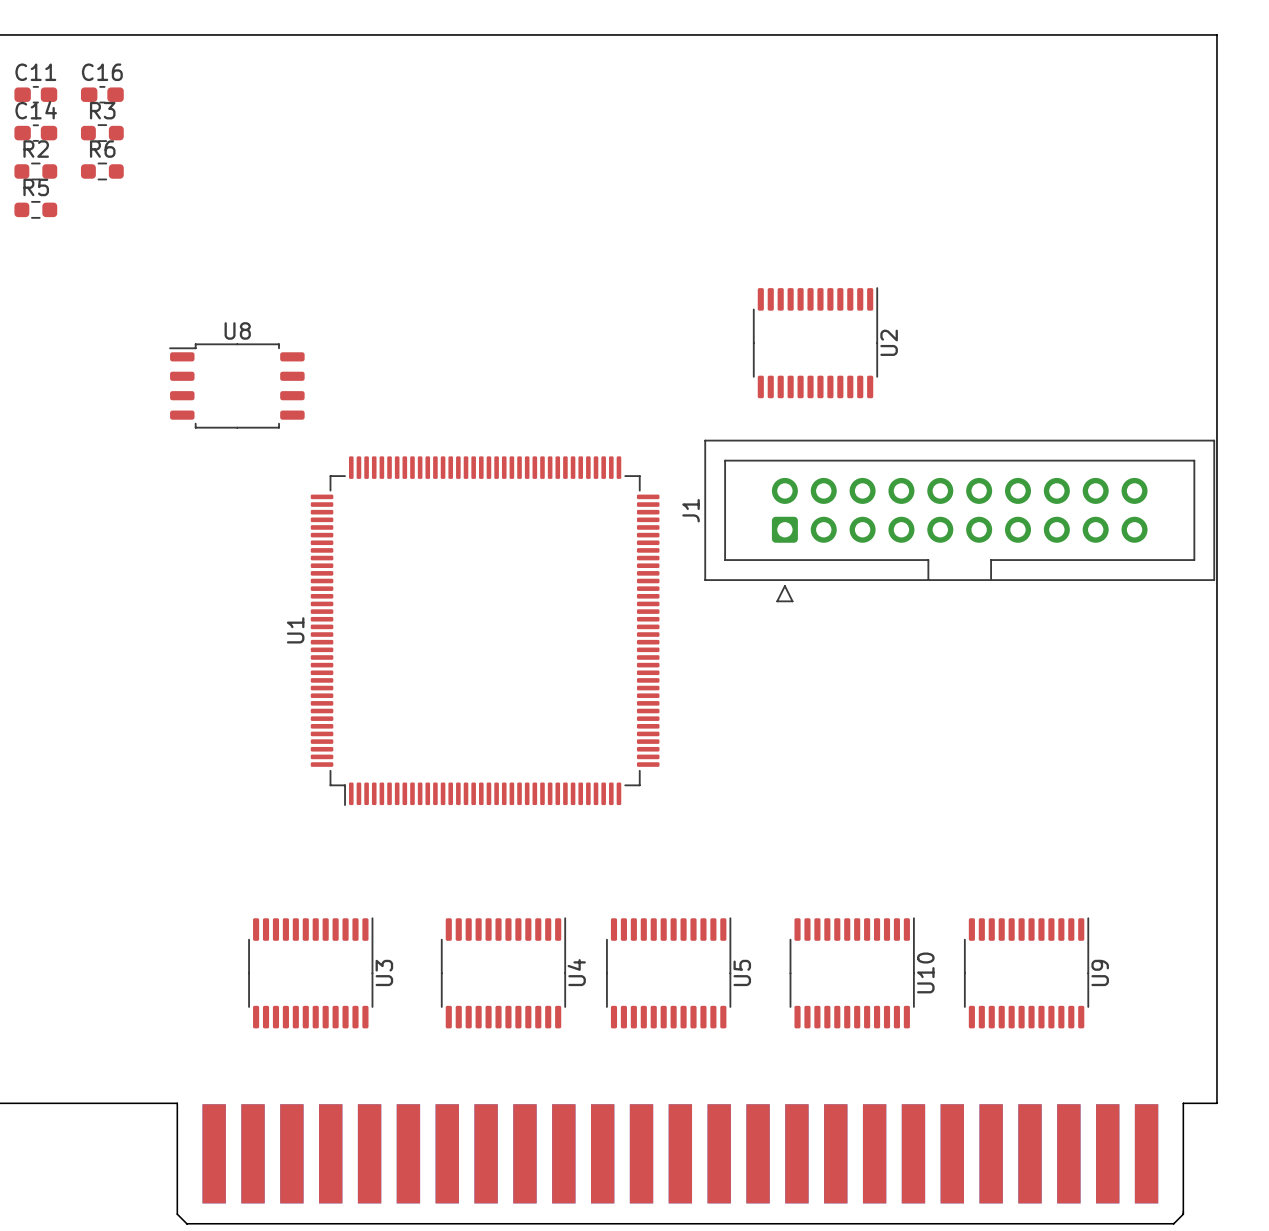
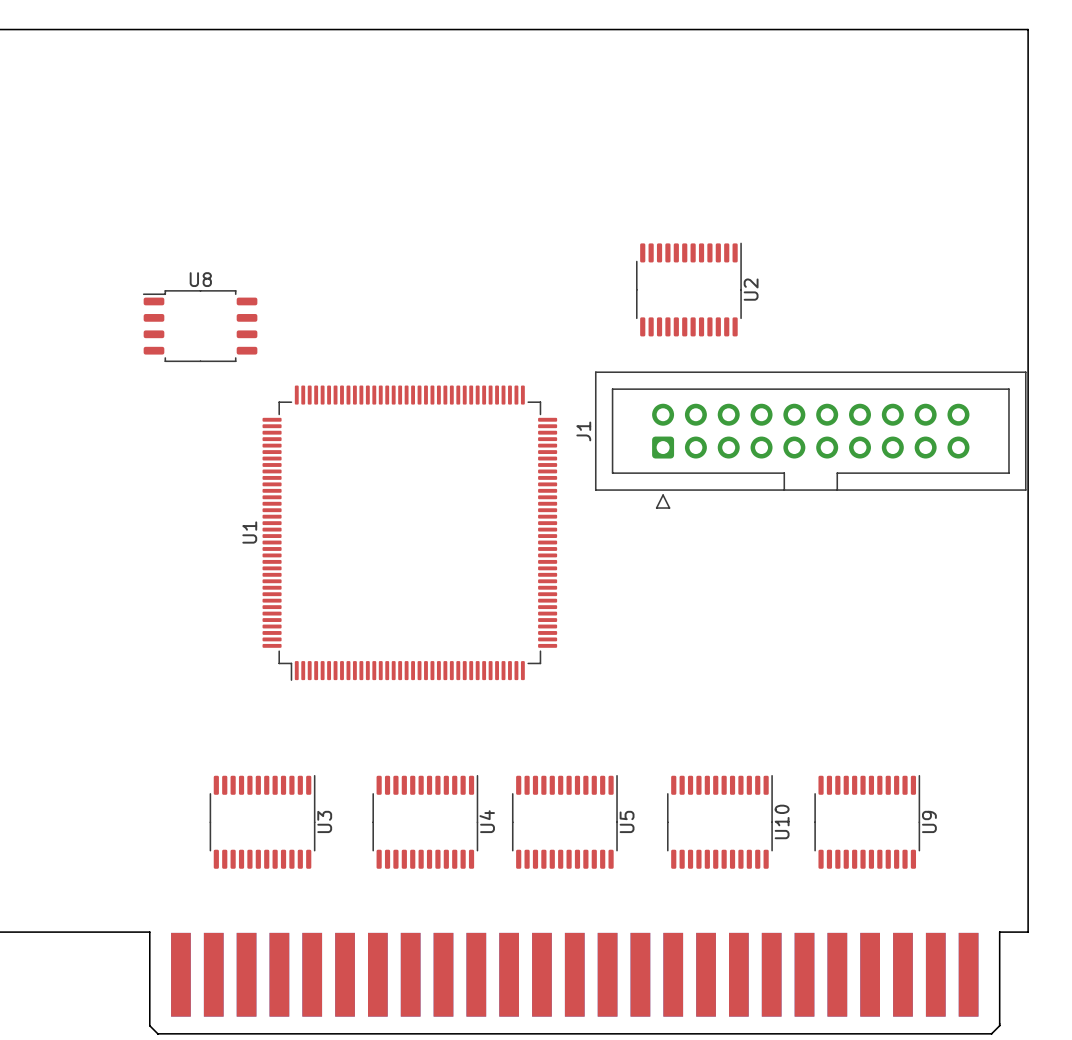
C11: (35, 94) -> none
C16: (102, 94) -> none
C14: (35, 133) -> none
R3: (102, 133) -> none
R2: (35, 171) -> none
R6: (102, 171) -> none
R5: (35, 209) -> none

